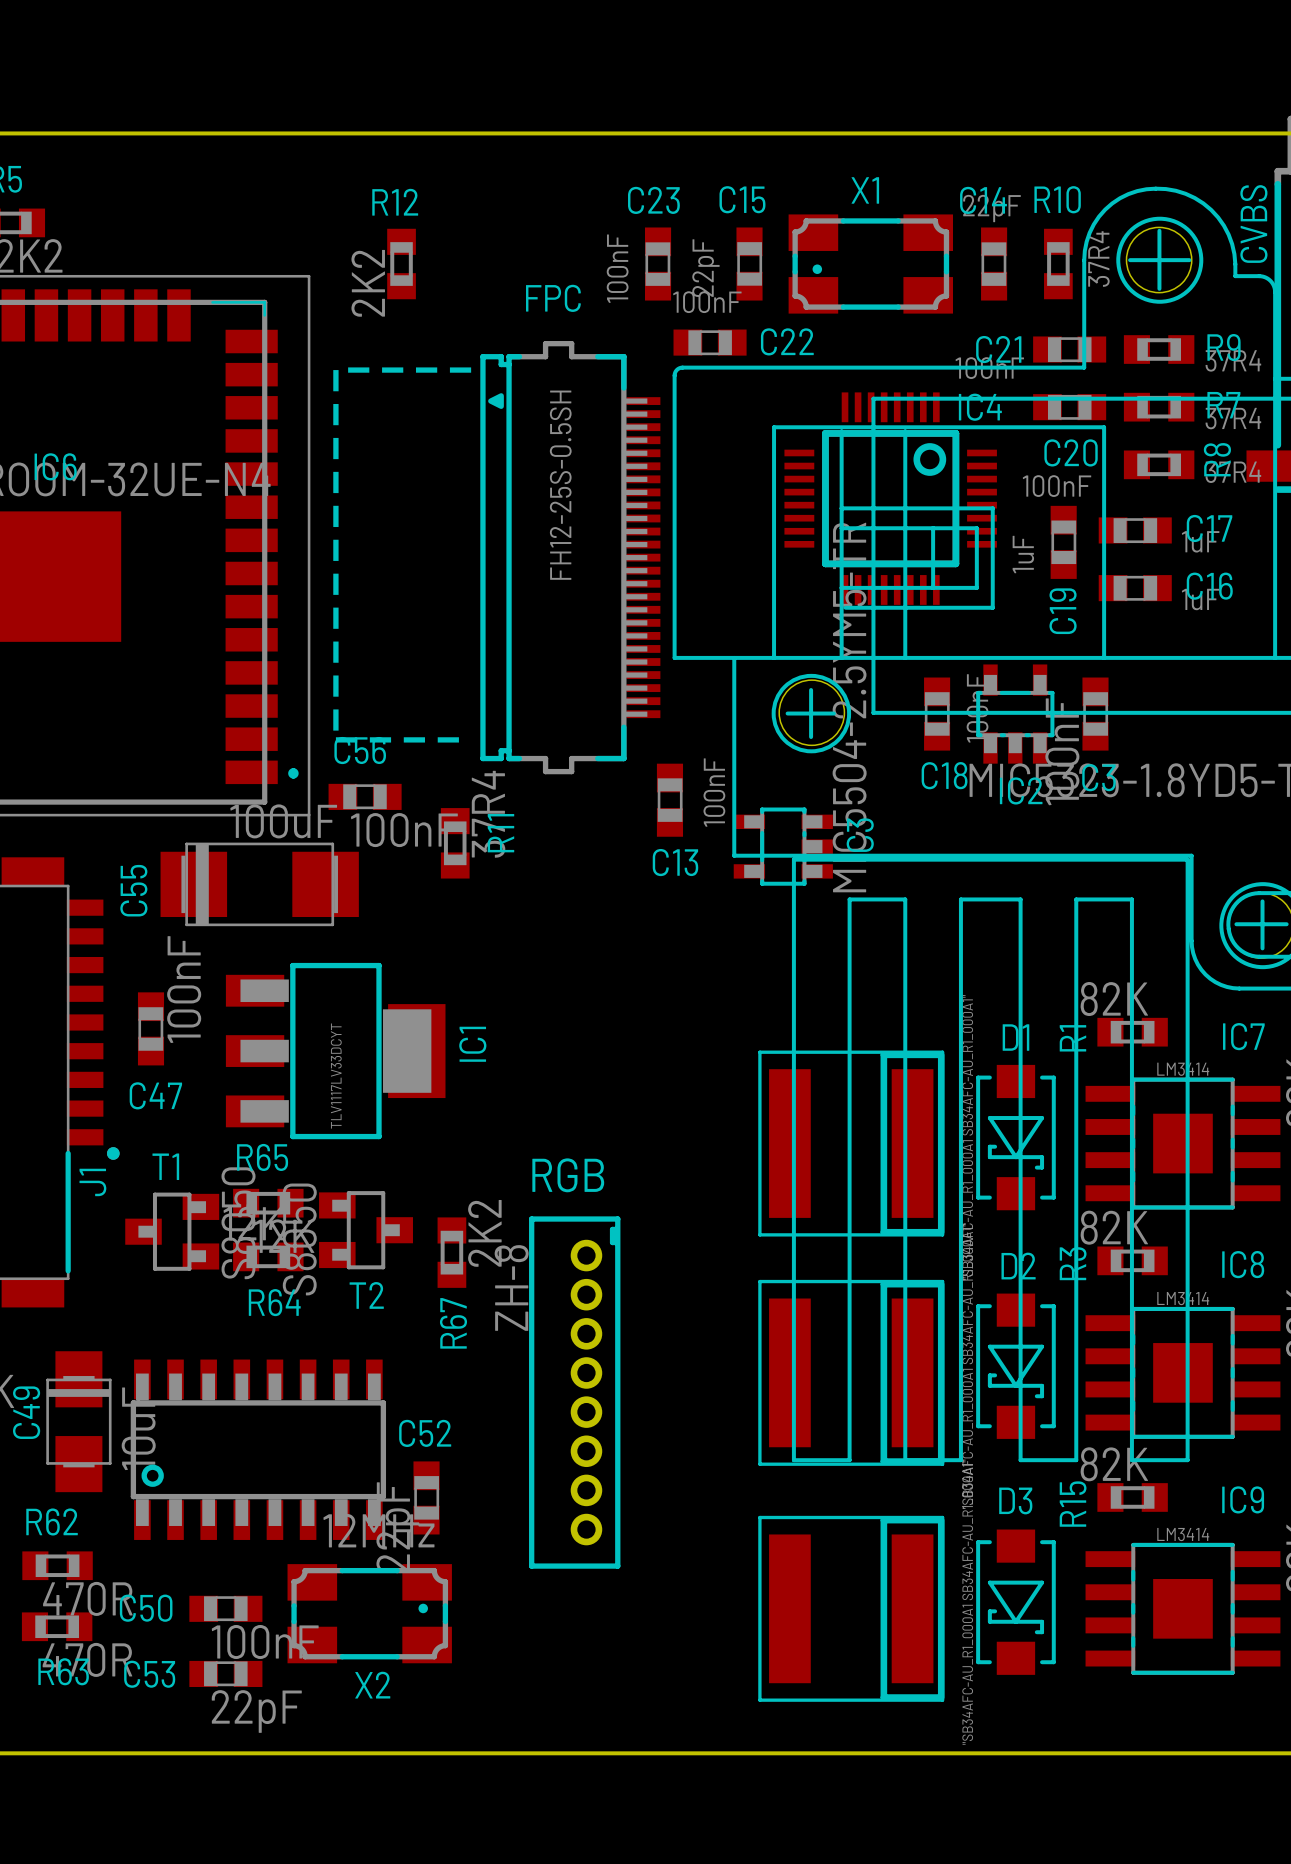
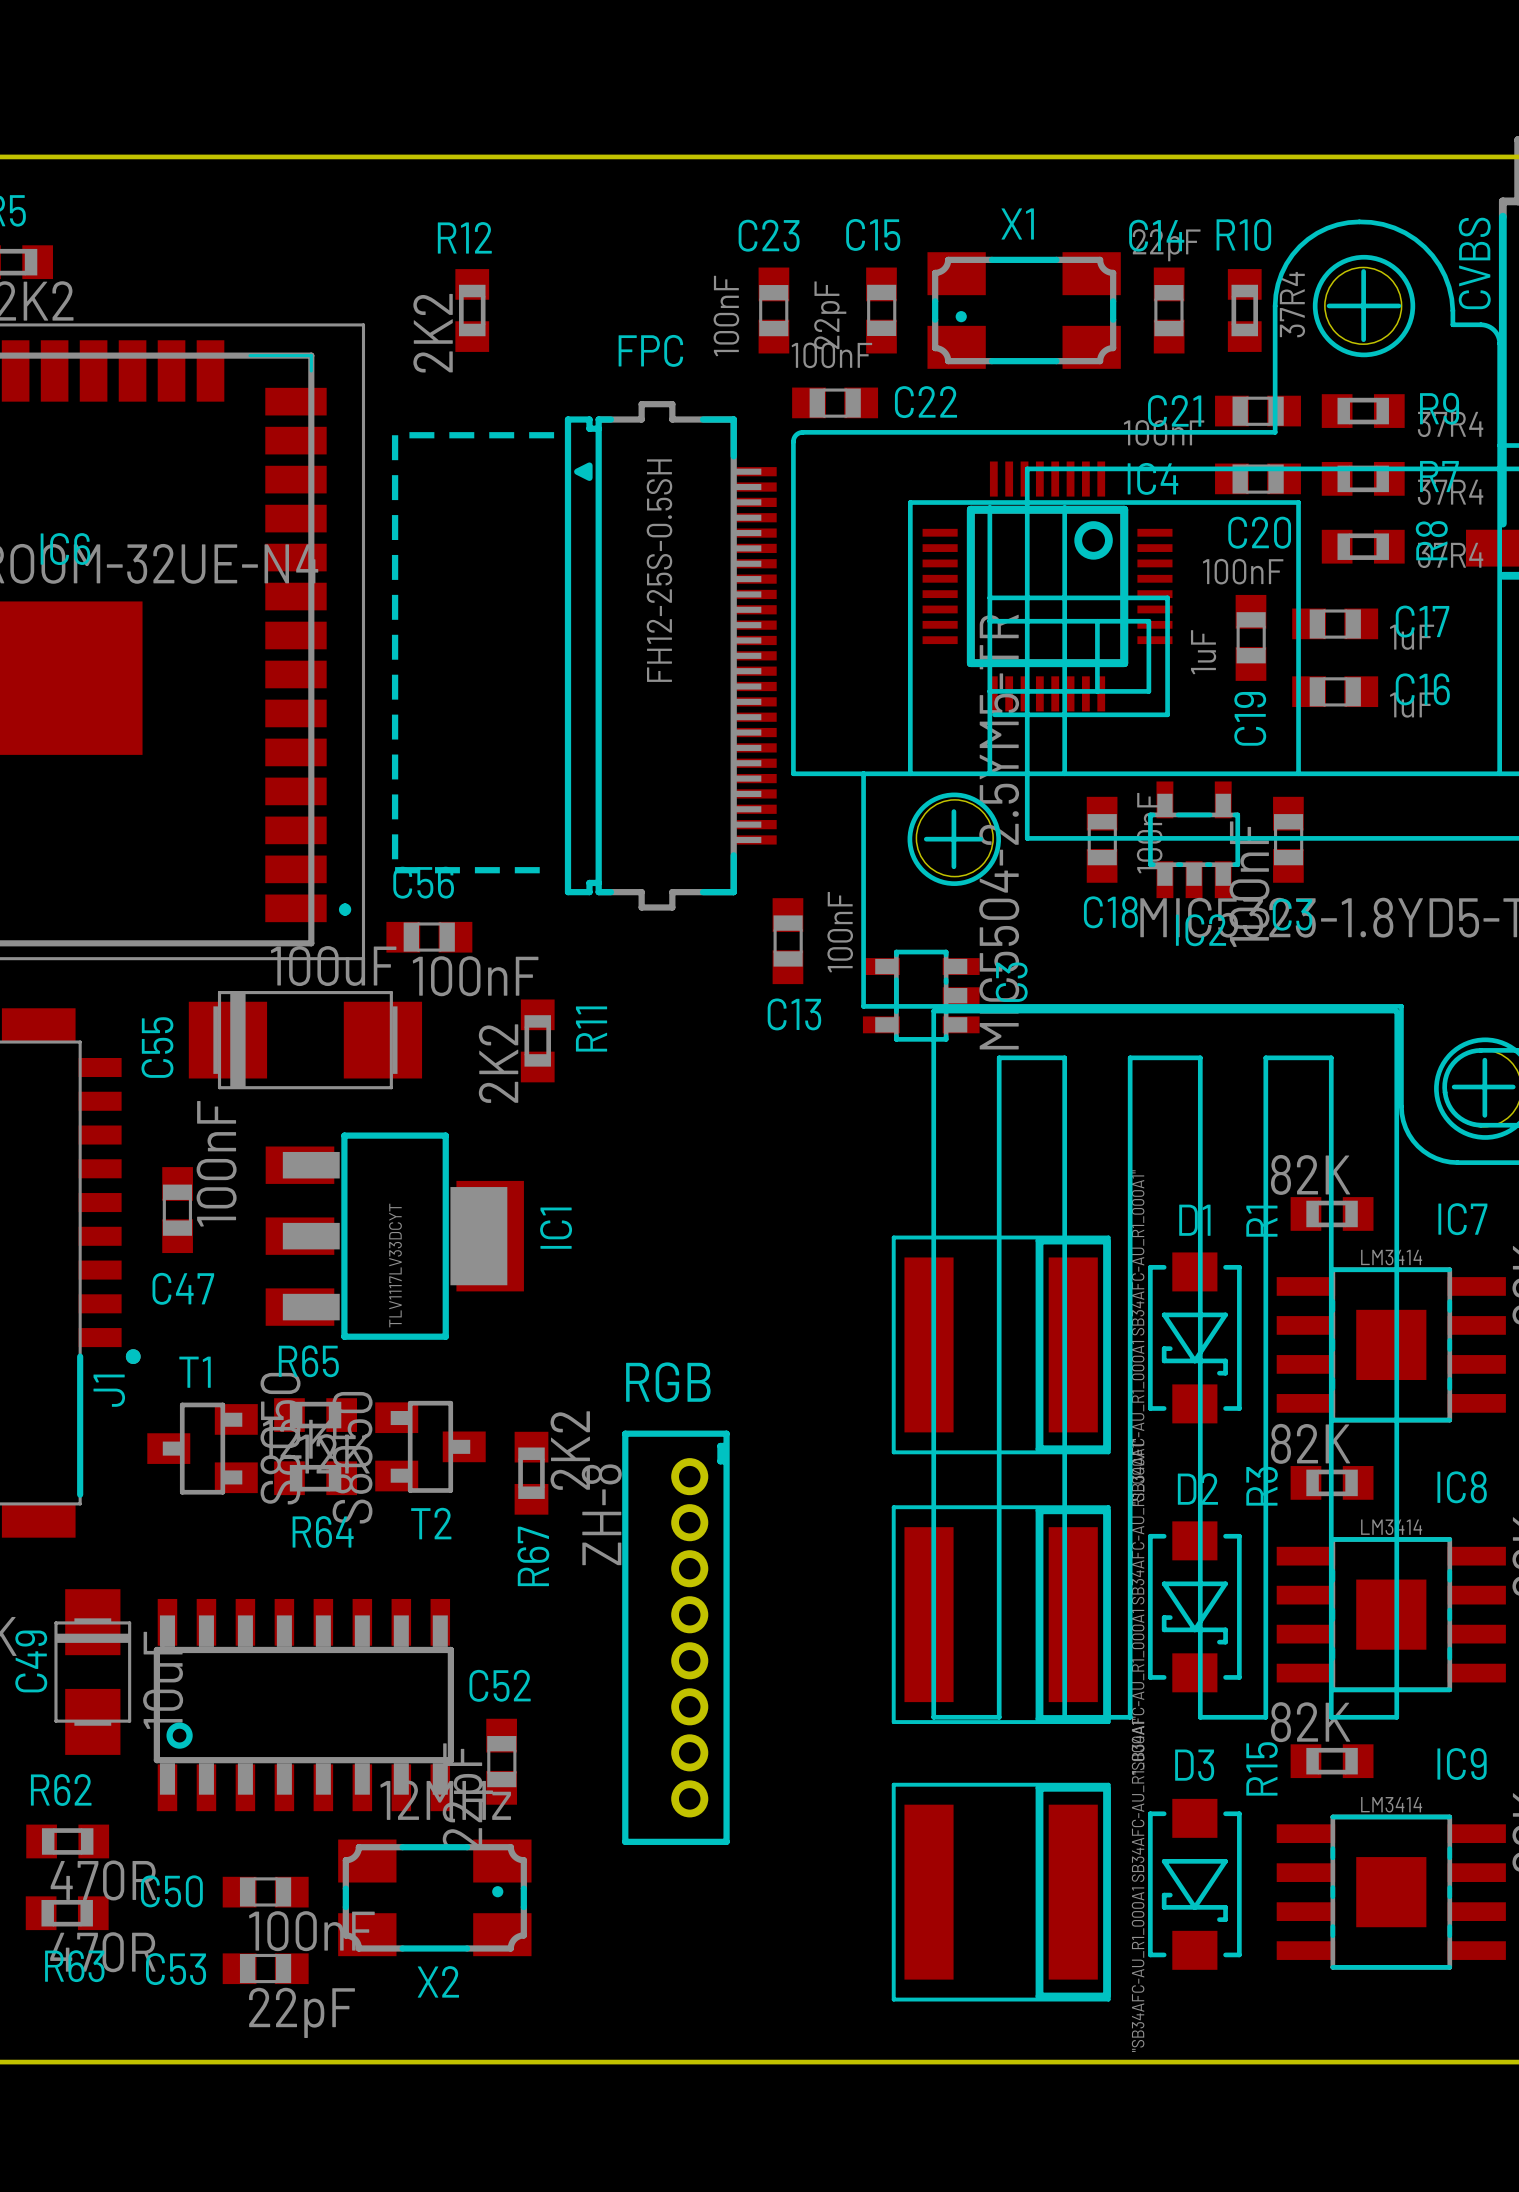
R11 value: 37R4 (488, 814) -> 2K2 (498, 1063)
R11 position: (455, 843) -> (537, 1040)

